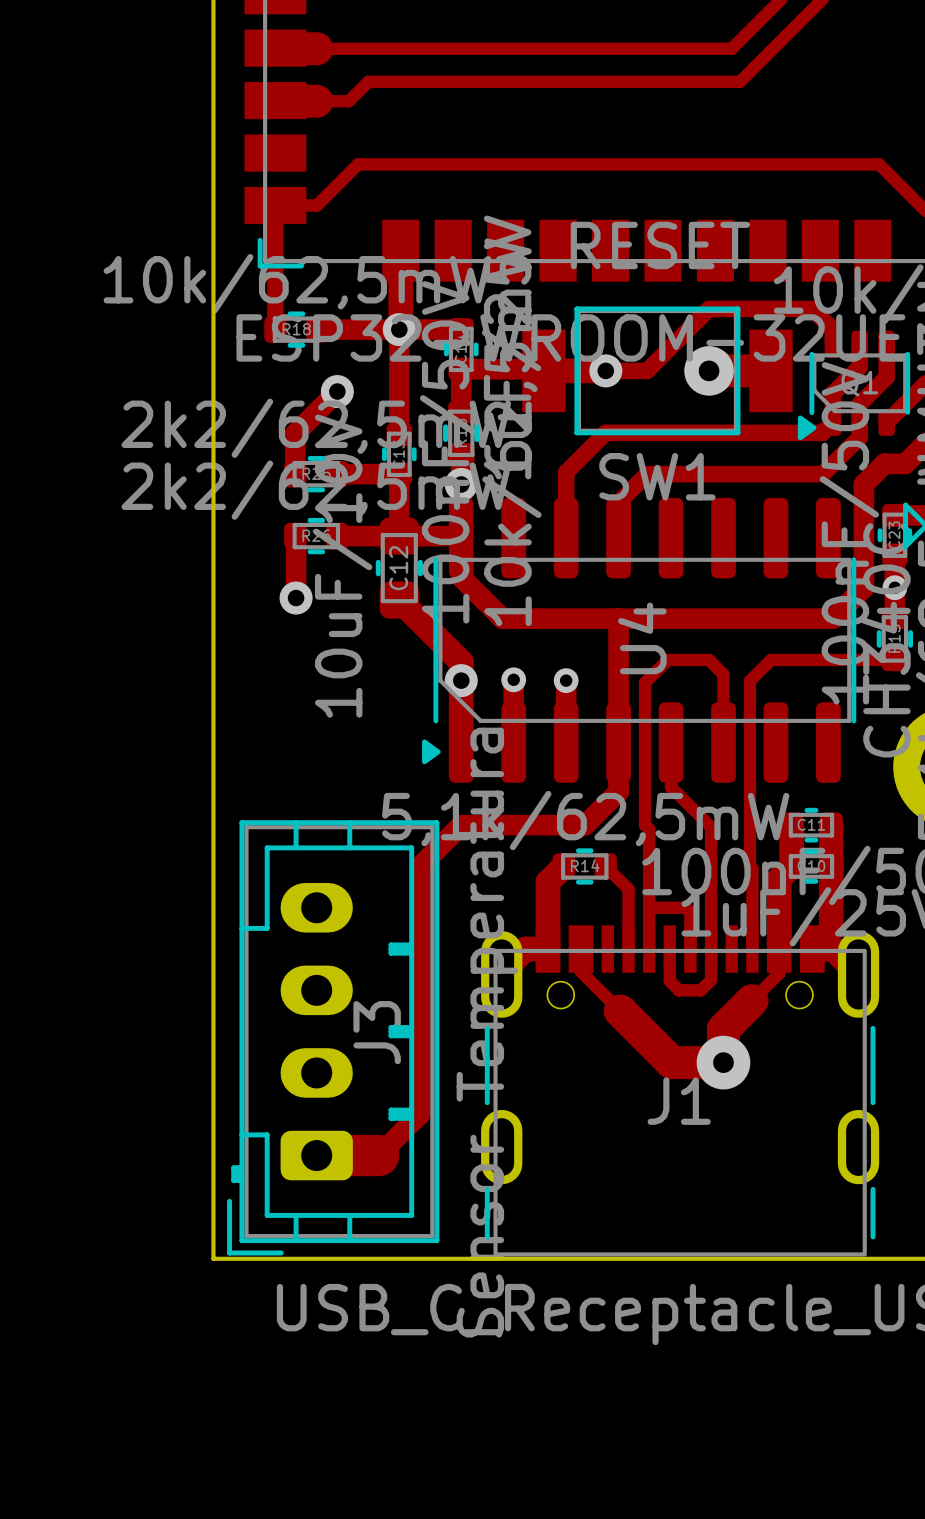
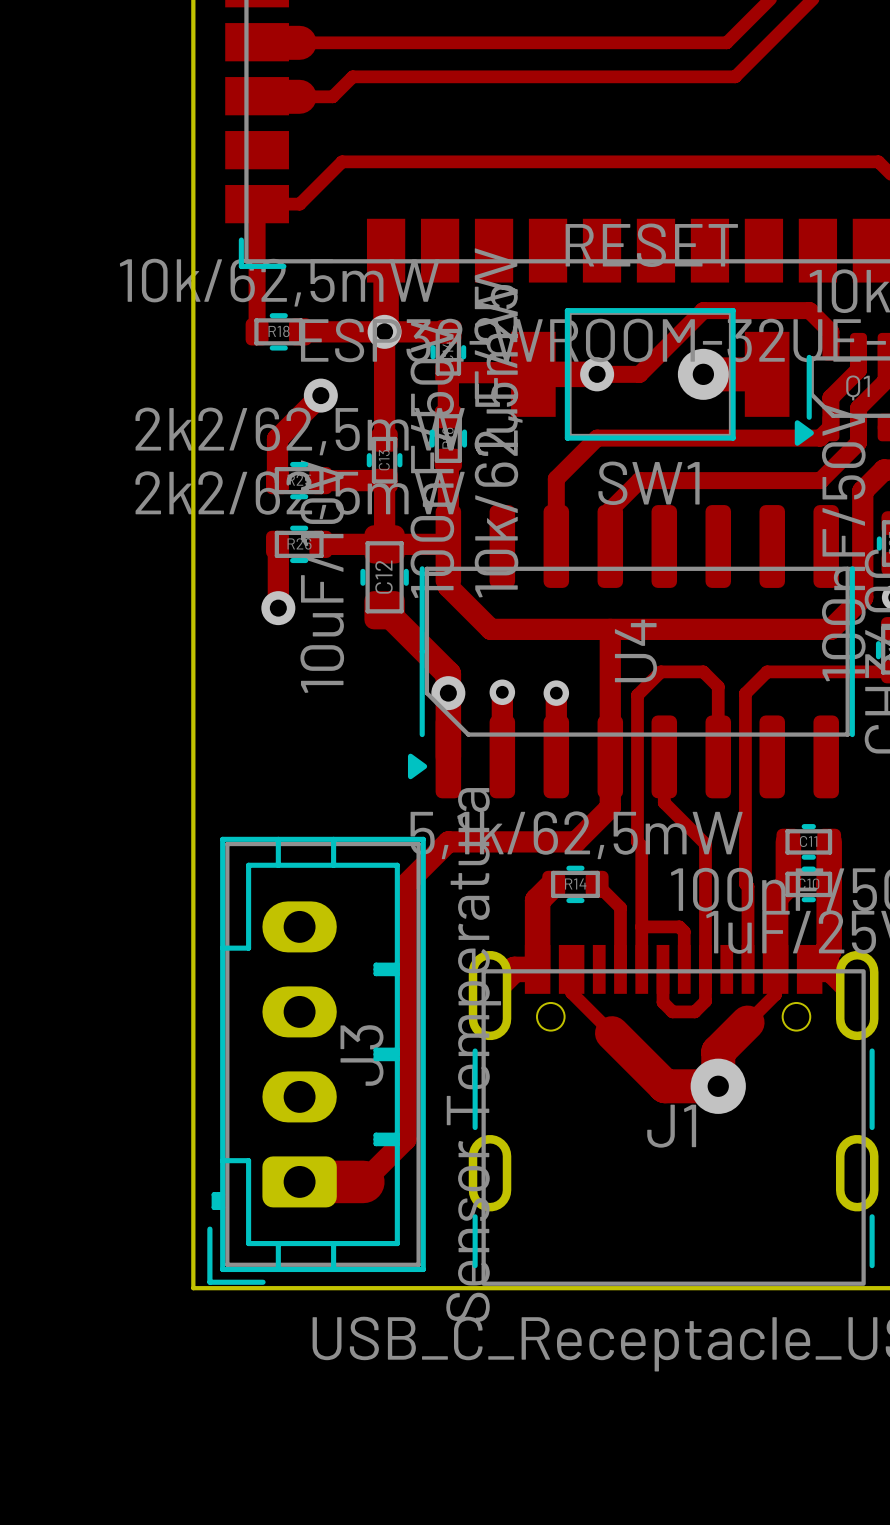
via: (461, 484) -> none

